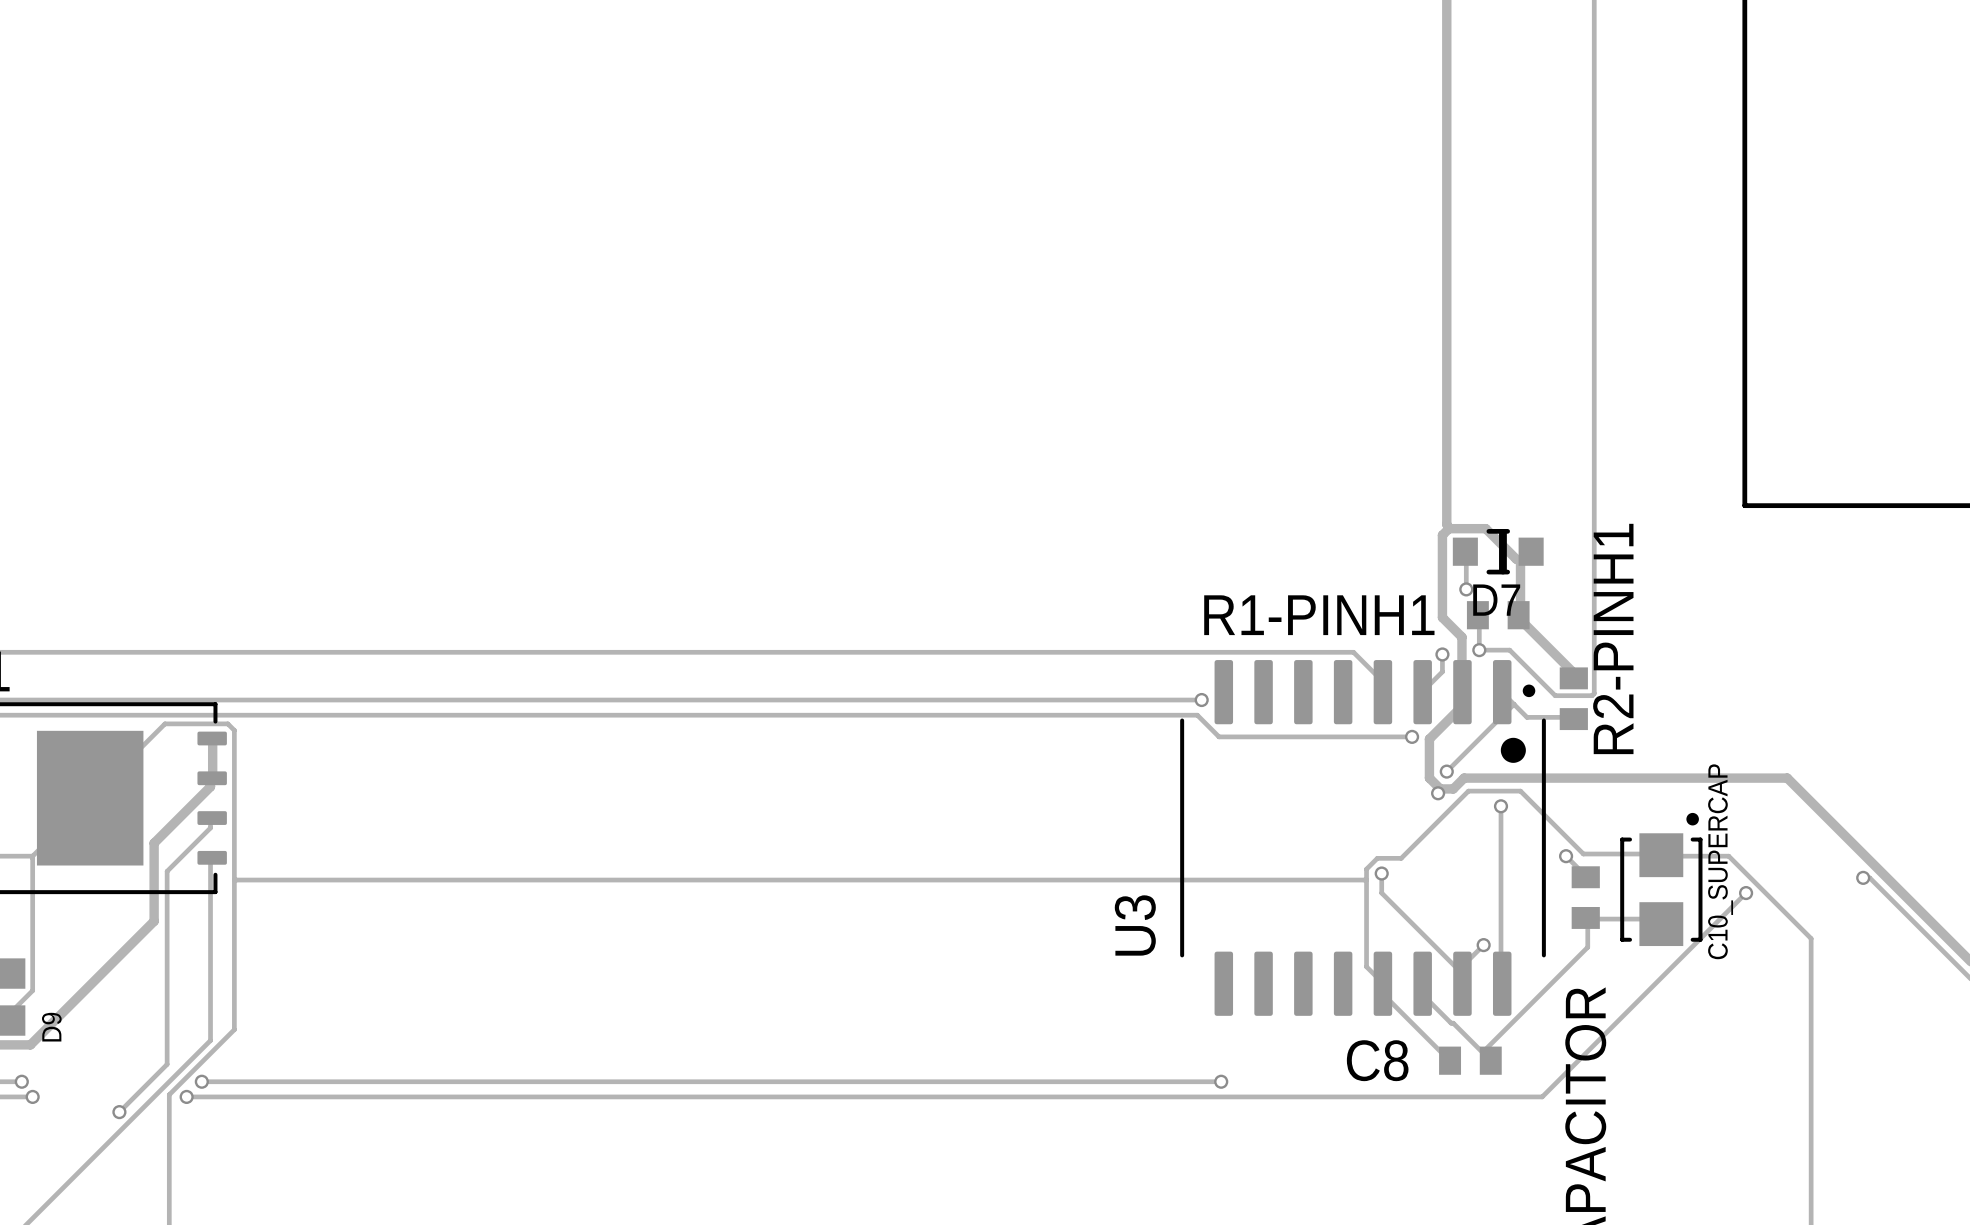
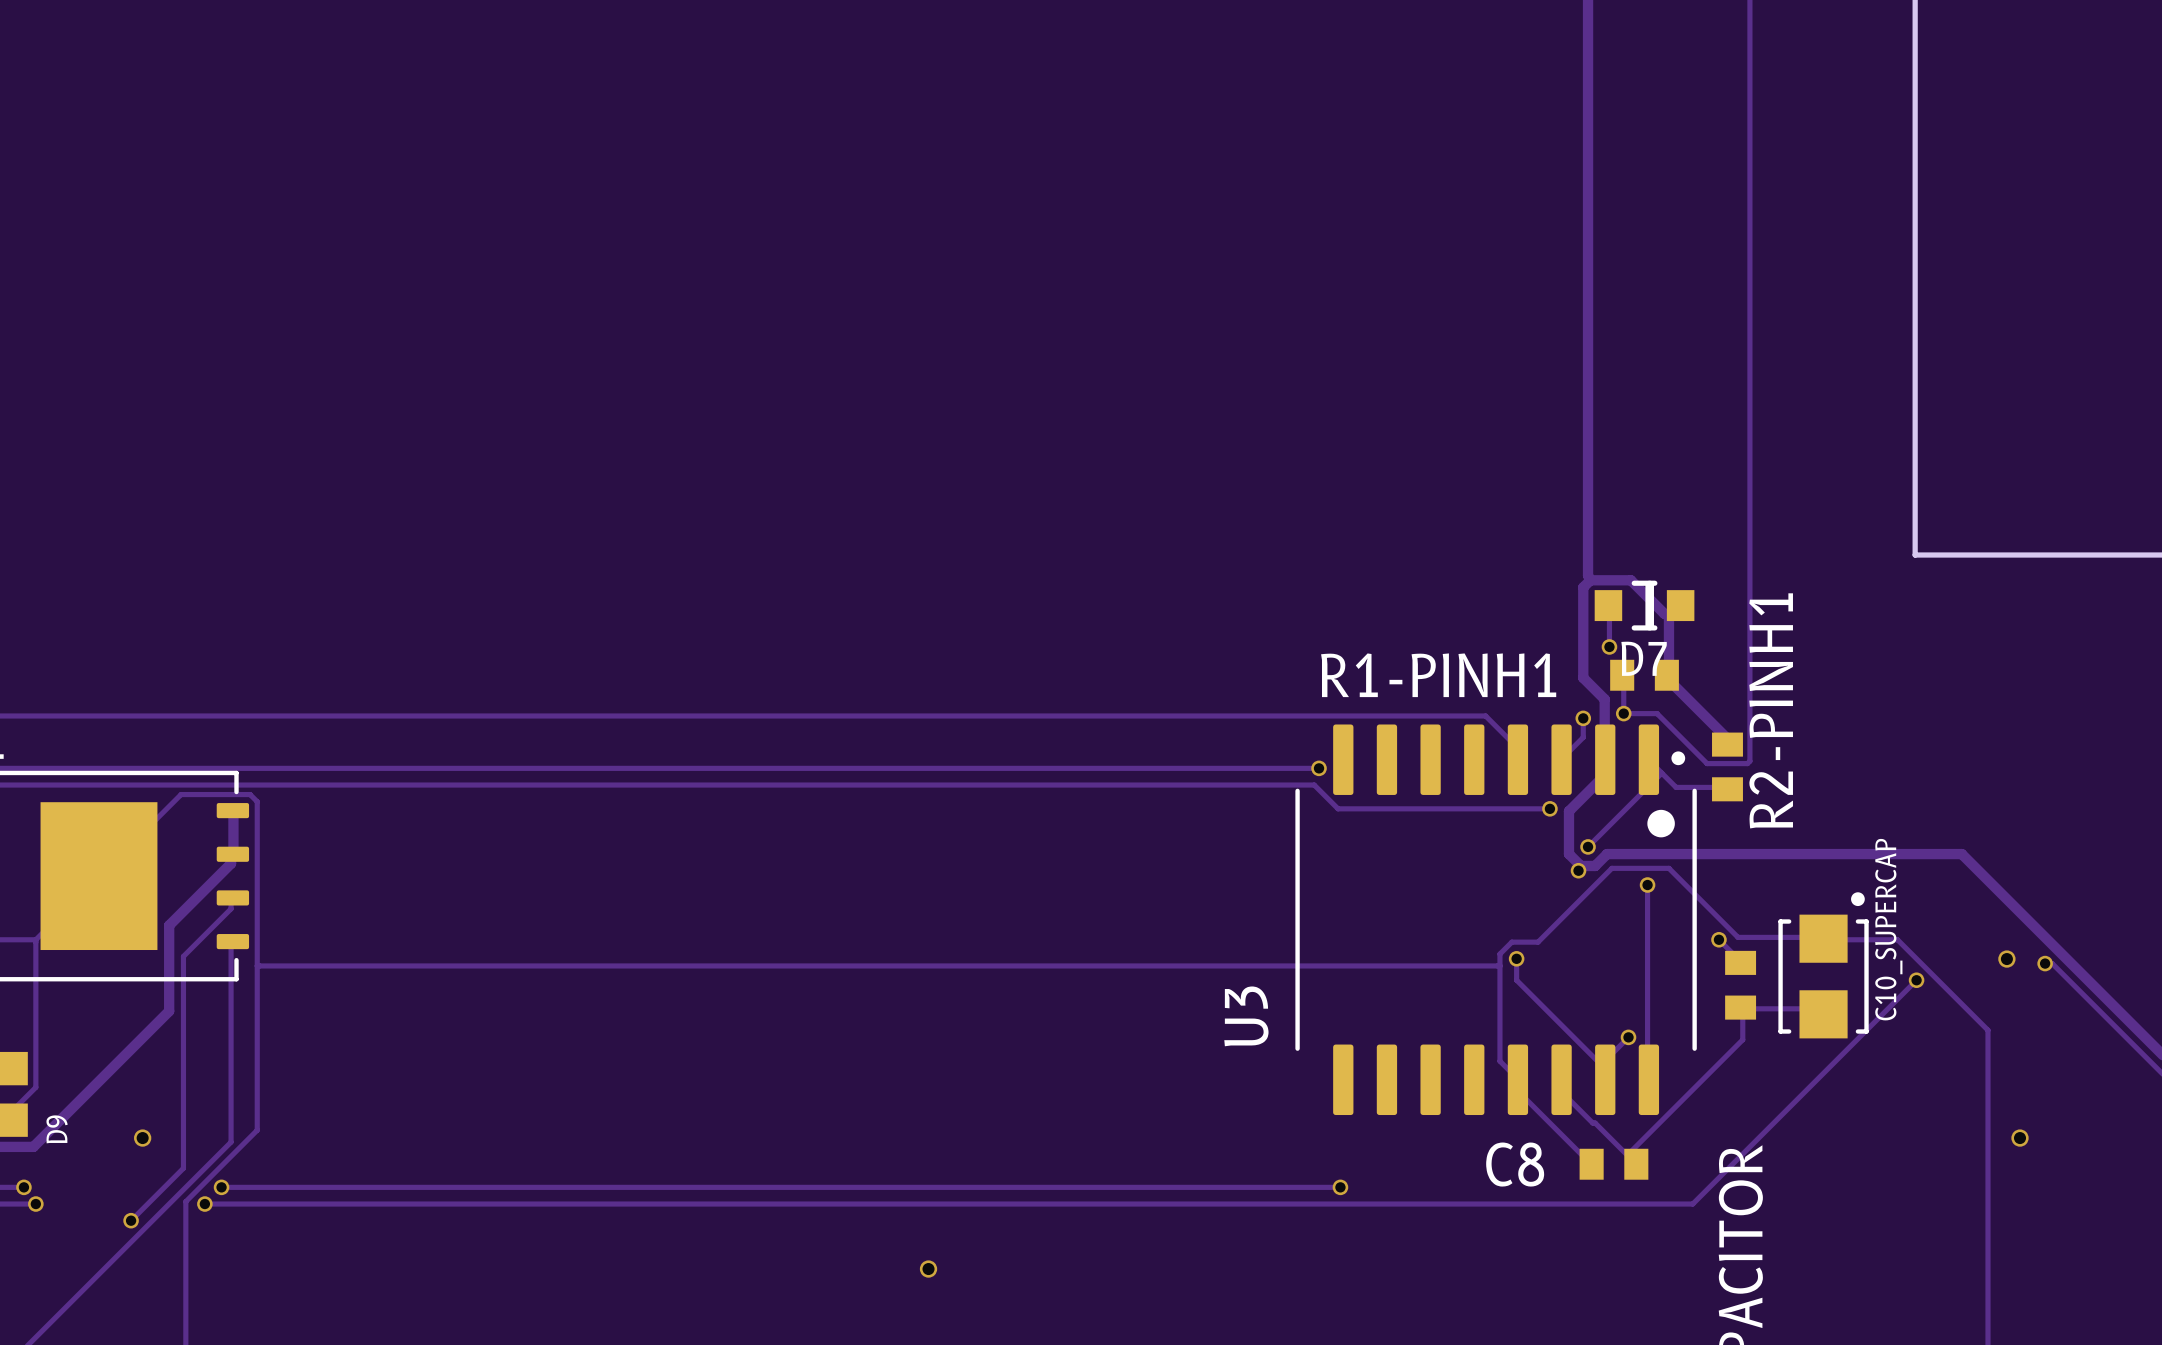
via: none -> (2006, 959)
via: none -> (142, 1138)
via: none -> (2020, 1138)
via: none -> (928, 1269)

